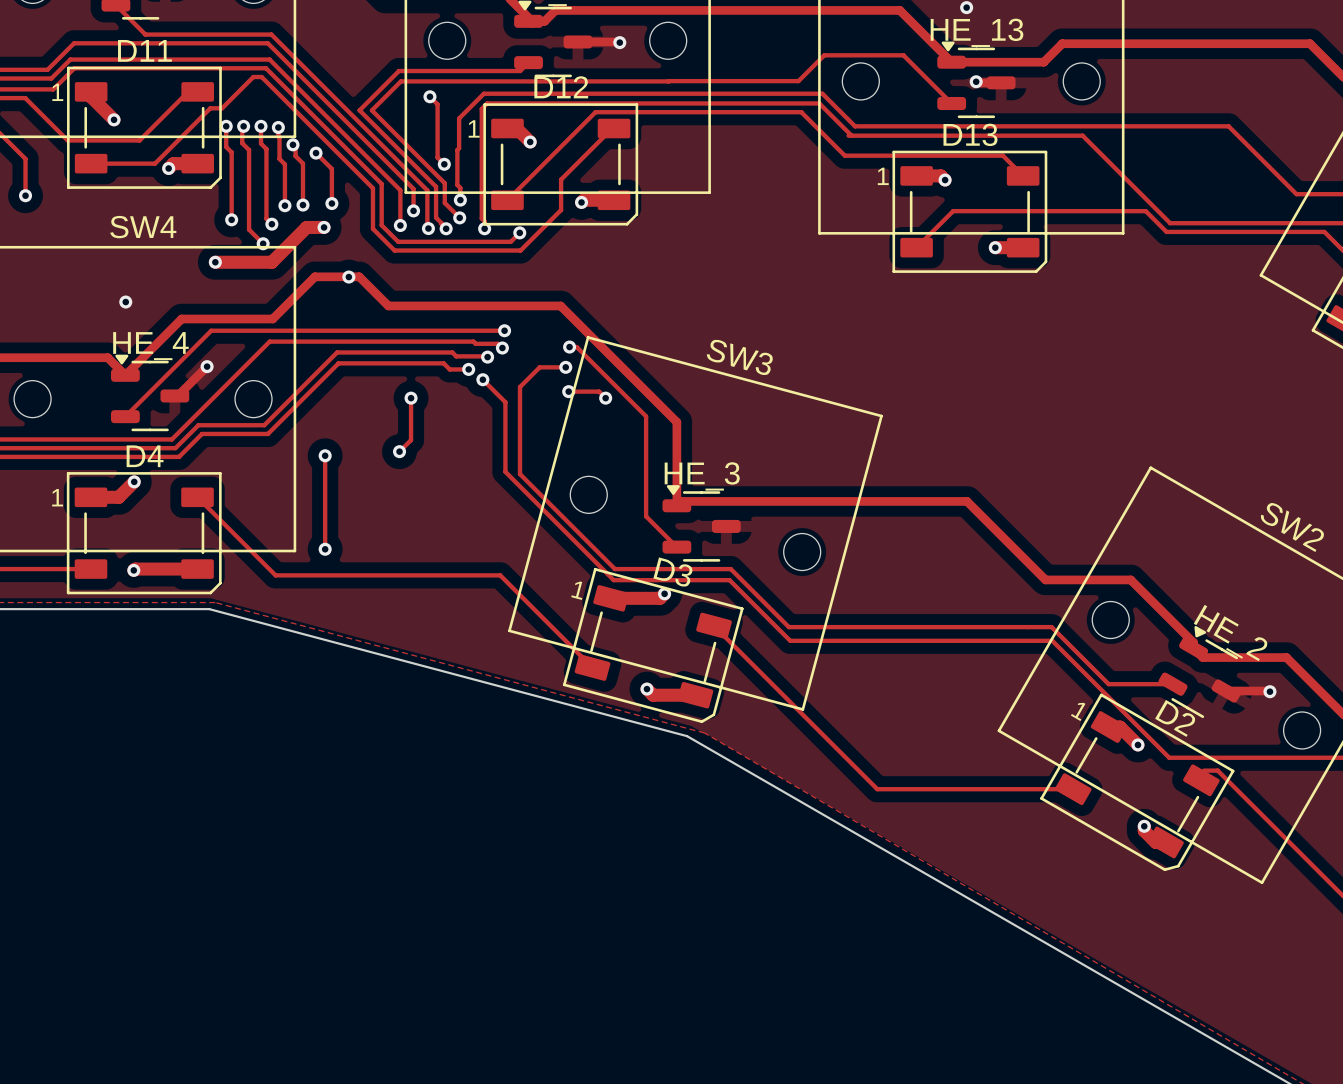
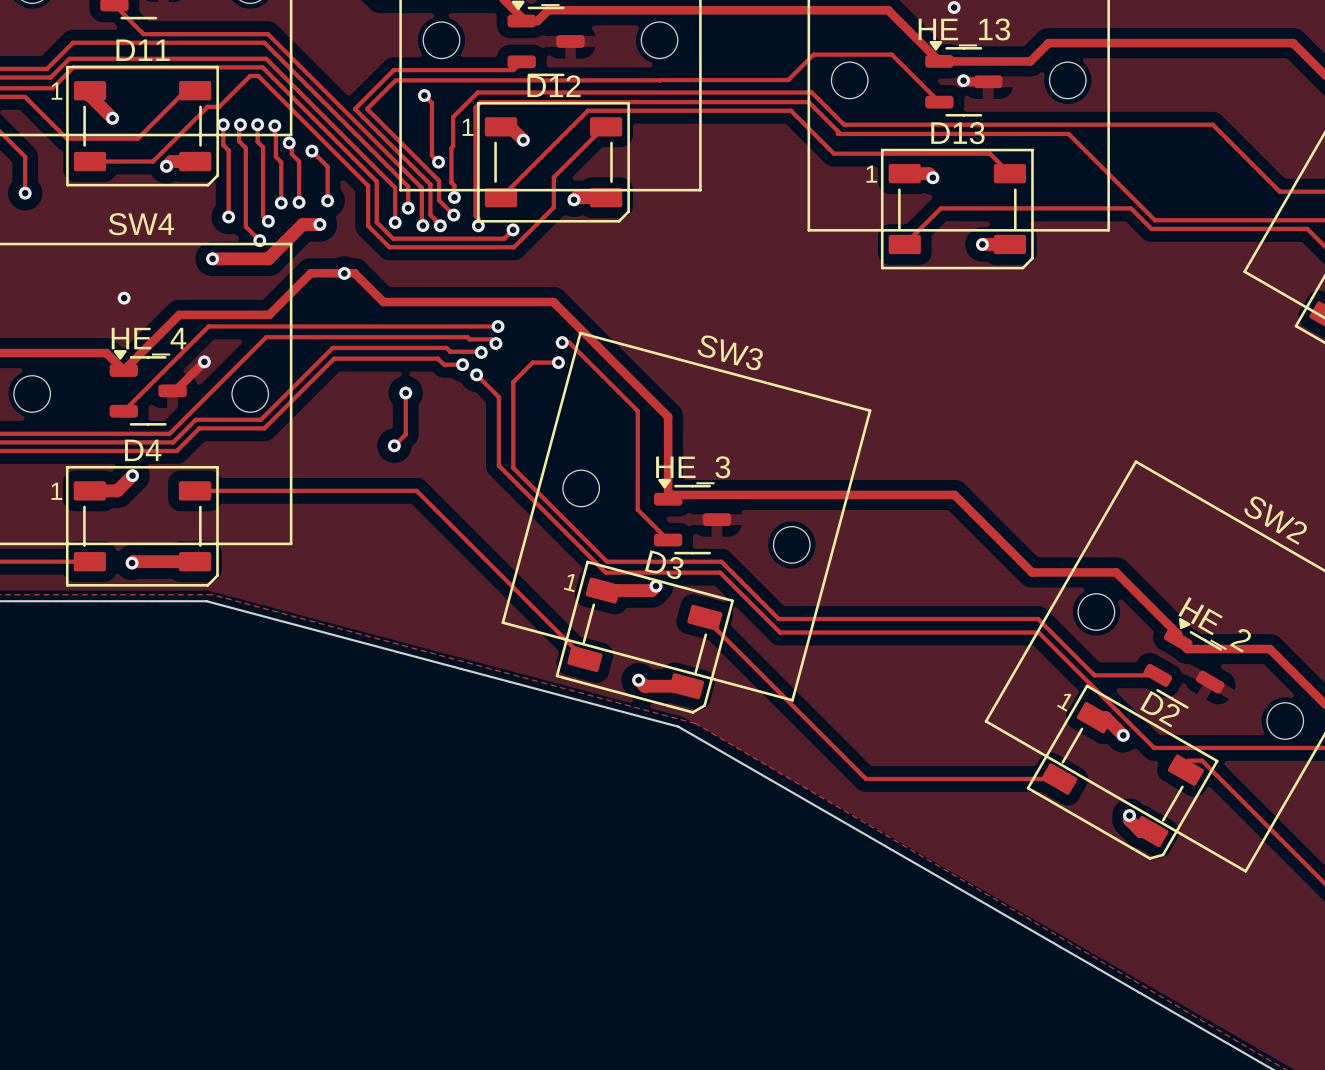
track: (577, 41) (619, 42) -> none
via: (619, 42) -> none
track: (568, 391) (599, 391) (605, 398) -> none
via: (568, 391) -> none
via: (605, 398) -> none
track: (325, 455) (325, 549) -> none
via: (325, 455) -> none
track: (197, 497) (275, 575) (500, 575) -> (194, 490) (416, 490) (493, 567)
via: (325, 549) -> none
track: (1226, 691) (1269, 691) -> none
via: (1269, 691) -> none

